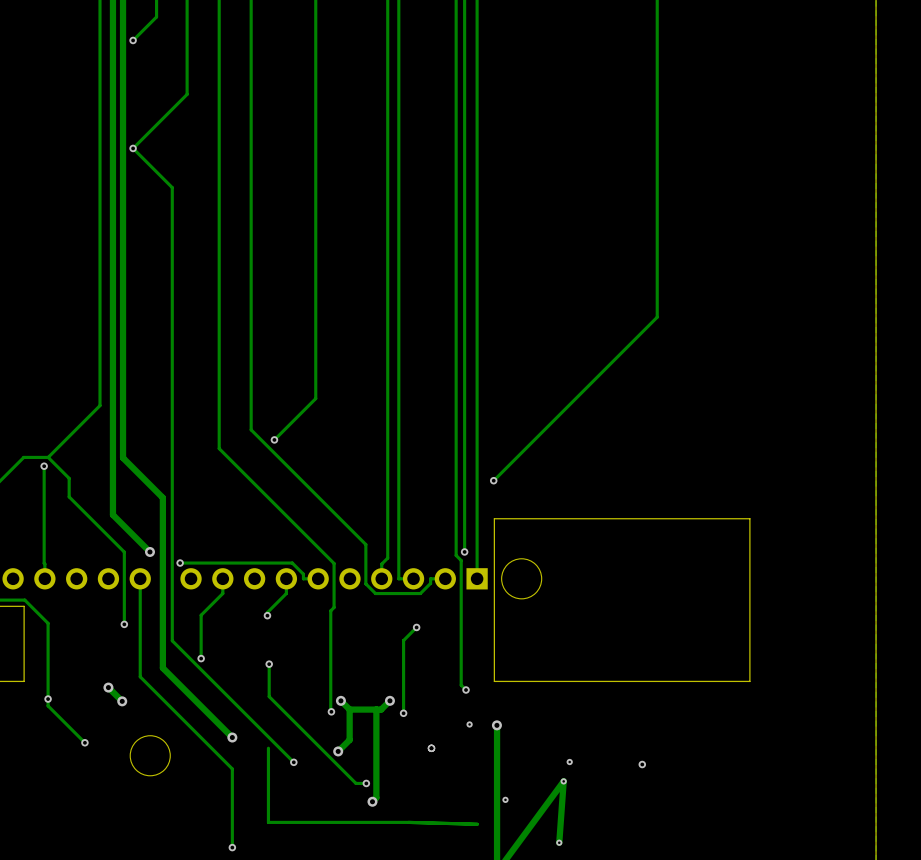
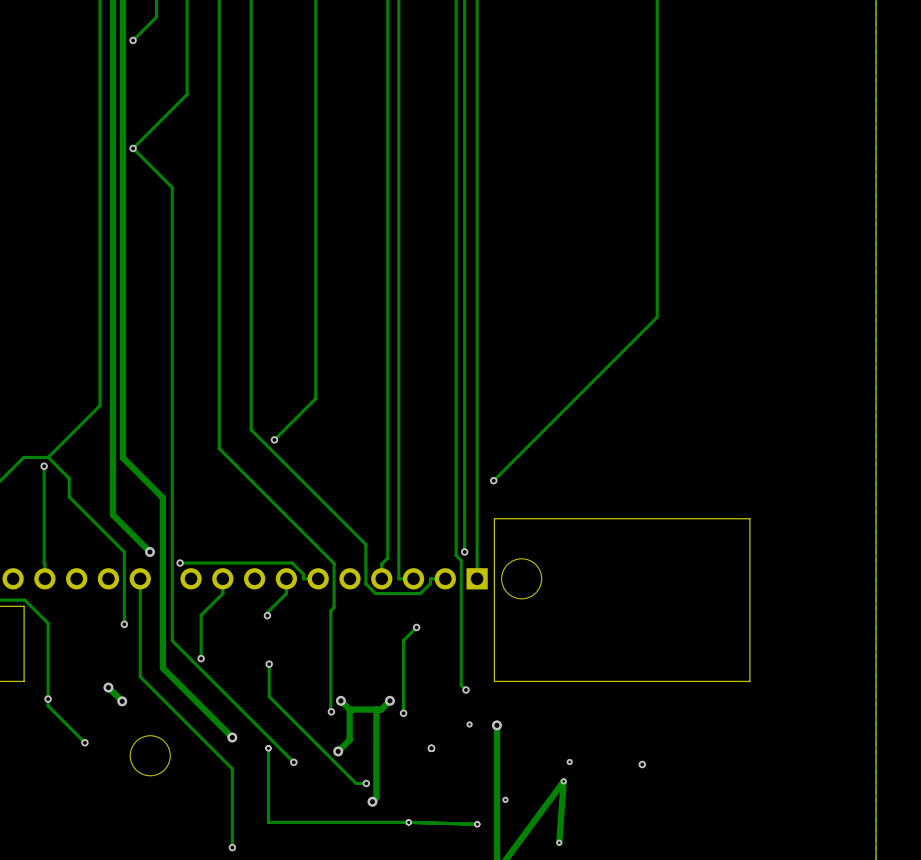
via: none -> (268, 748)
via: none -> (408, 822)
via: none -> (477, 824)

